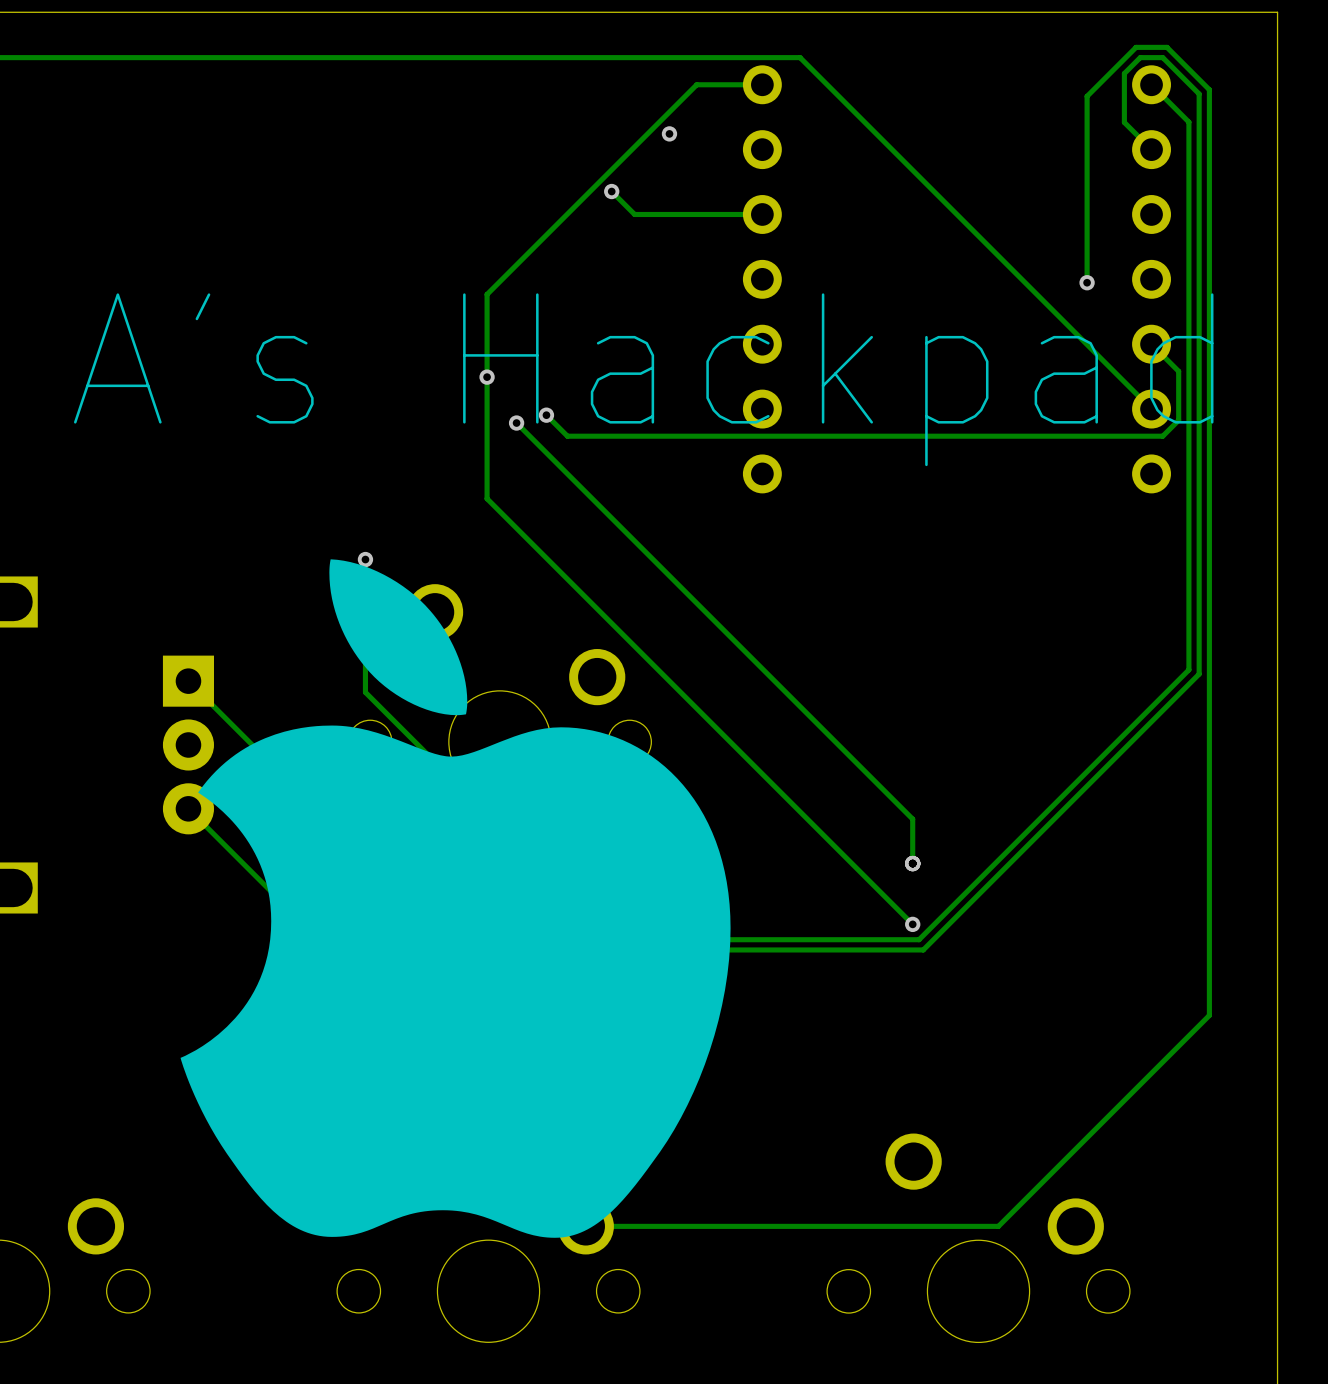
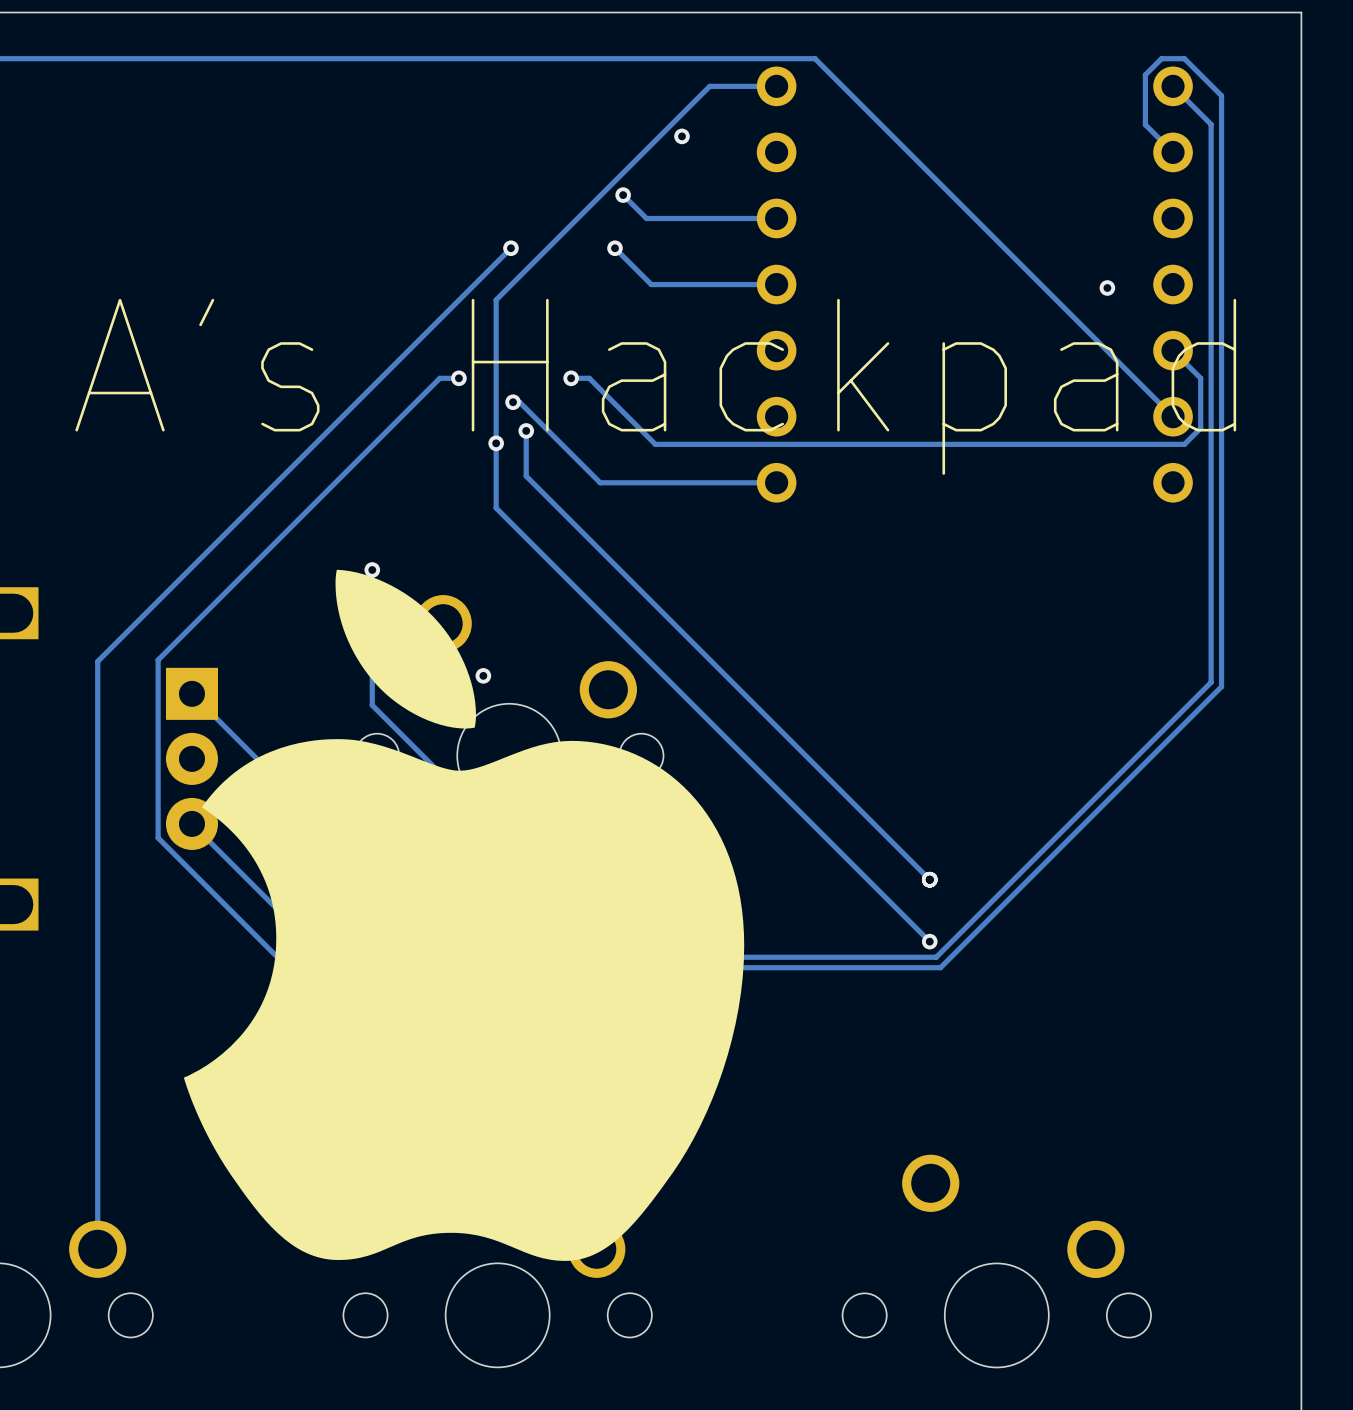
track: none -> (510, 248) (97, 661) (97, 1249)
via: none -> (510, 248)
track: none -> (615, 248) (651, 284) (776, 284)
via: none -> (615, 248)
track: (1087, 281) (1087, 96) (1136, 47) (1167, 47) (1209, 89) (1209, 1015) (998, 1226) (585, 1226) -> (458, 378) (439, 378) (158, 660) (158, 837) (569, 1249) (596, 1249)
via: none -> (458, 378)
via: none -> (571, 378)
via: (487, 377) -> none
track: none -> (513, 402) (519, 402) (600, 482) (776, 482)
via: none -> (513, 402)
track: (546, 415) (567, 436) (643, 436) -> (571, 378) (589, 378) (655, 444)
via: (546, 415) -> none
track: (516, 423) (912, 819) (912, 863) -> (526, 430) (526, 476) (929, 879)
via: none -> (496, 443)
via: none -> (483, 675)

